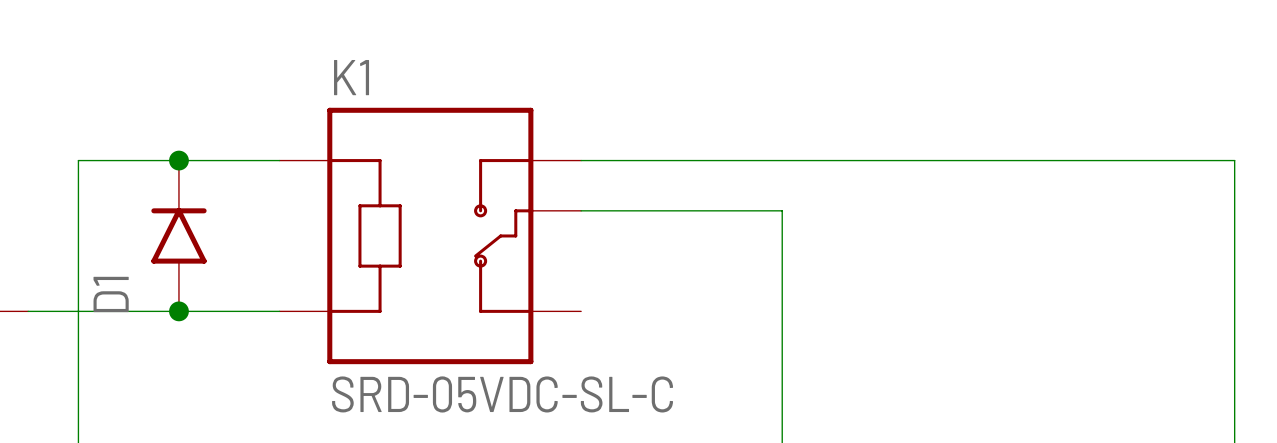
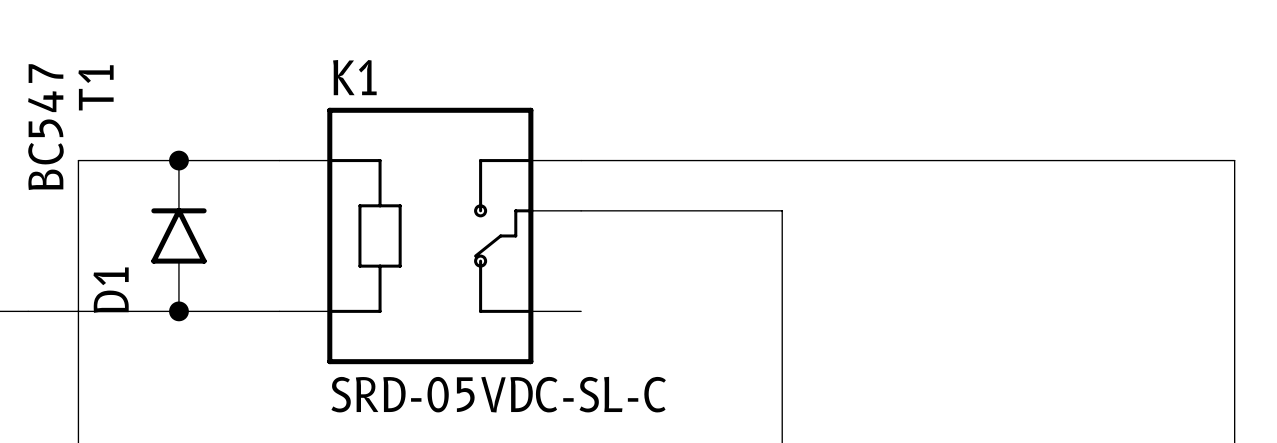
T1 name: none -> T1 (96, 87)
T1 value: none -> BC547 (45, 127)

